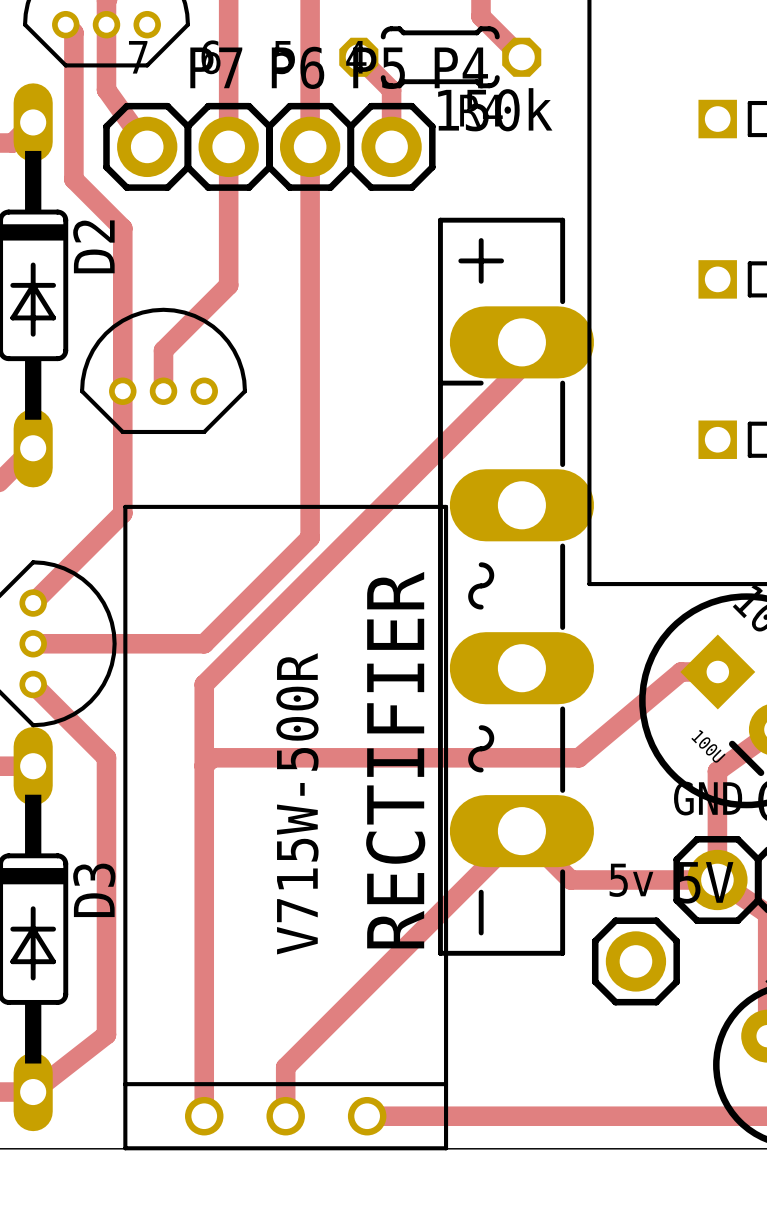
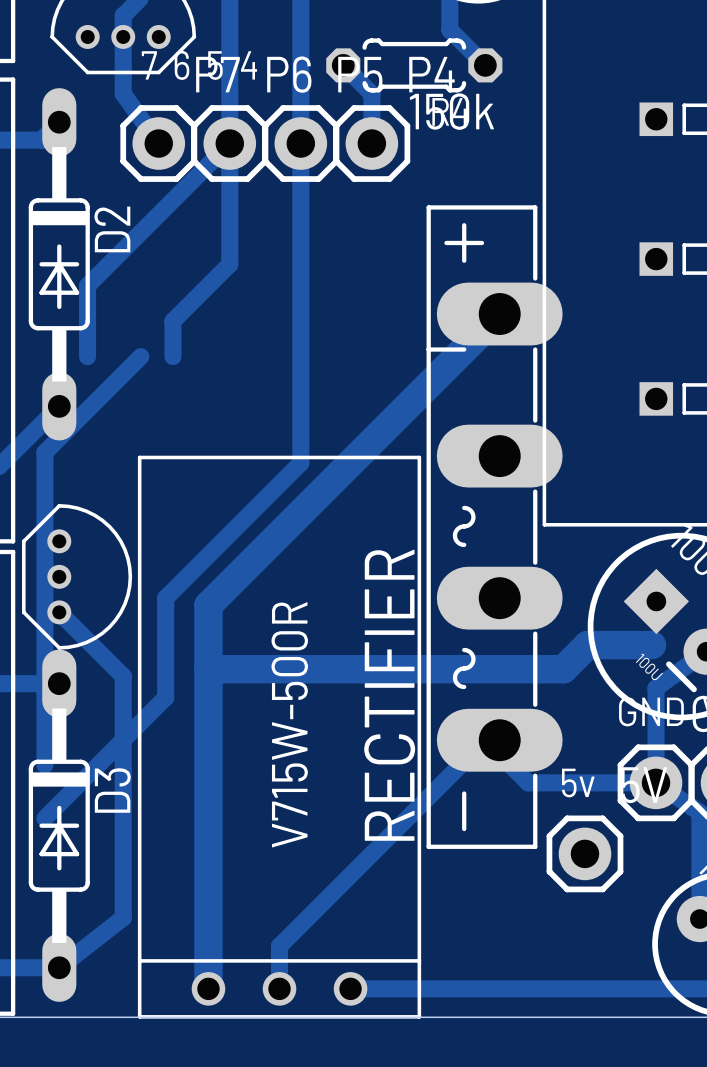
track: (65, 24) (73, 32) (73, 179) (122, 228) (122, 513) (33, 603) -> none
track: none -> (229, 143) (87, 285) (87, 356)
track: (521, 342) (521, 366) (204, 684) -> (499, 314) (208, 605) (208, 612)
part: (163, 370) -> none
track: none -> (140, 356) (44, 452) (44, 765)
track: (310, 513) (310, 537) (204, 643) (33, 643) -> (300, 463) (165, 598) (165, 697) (44, 818)
RECTIFIER position: (516, 586) -> (494, 527)
track: (717, 671) (681, 671) (578, 757) (212, 757) (204, 765) -> none
track width: thin (204, 684) (204, 1116) -> thick (208, 612) (208, 988)
track: none -> (652, 645) (587, 645) (563, 669) (208, 669)

